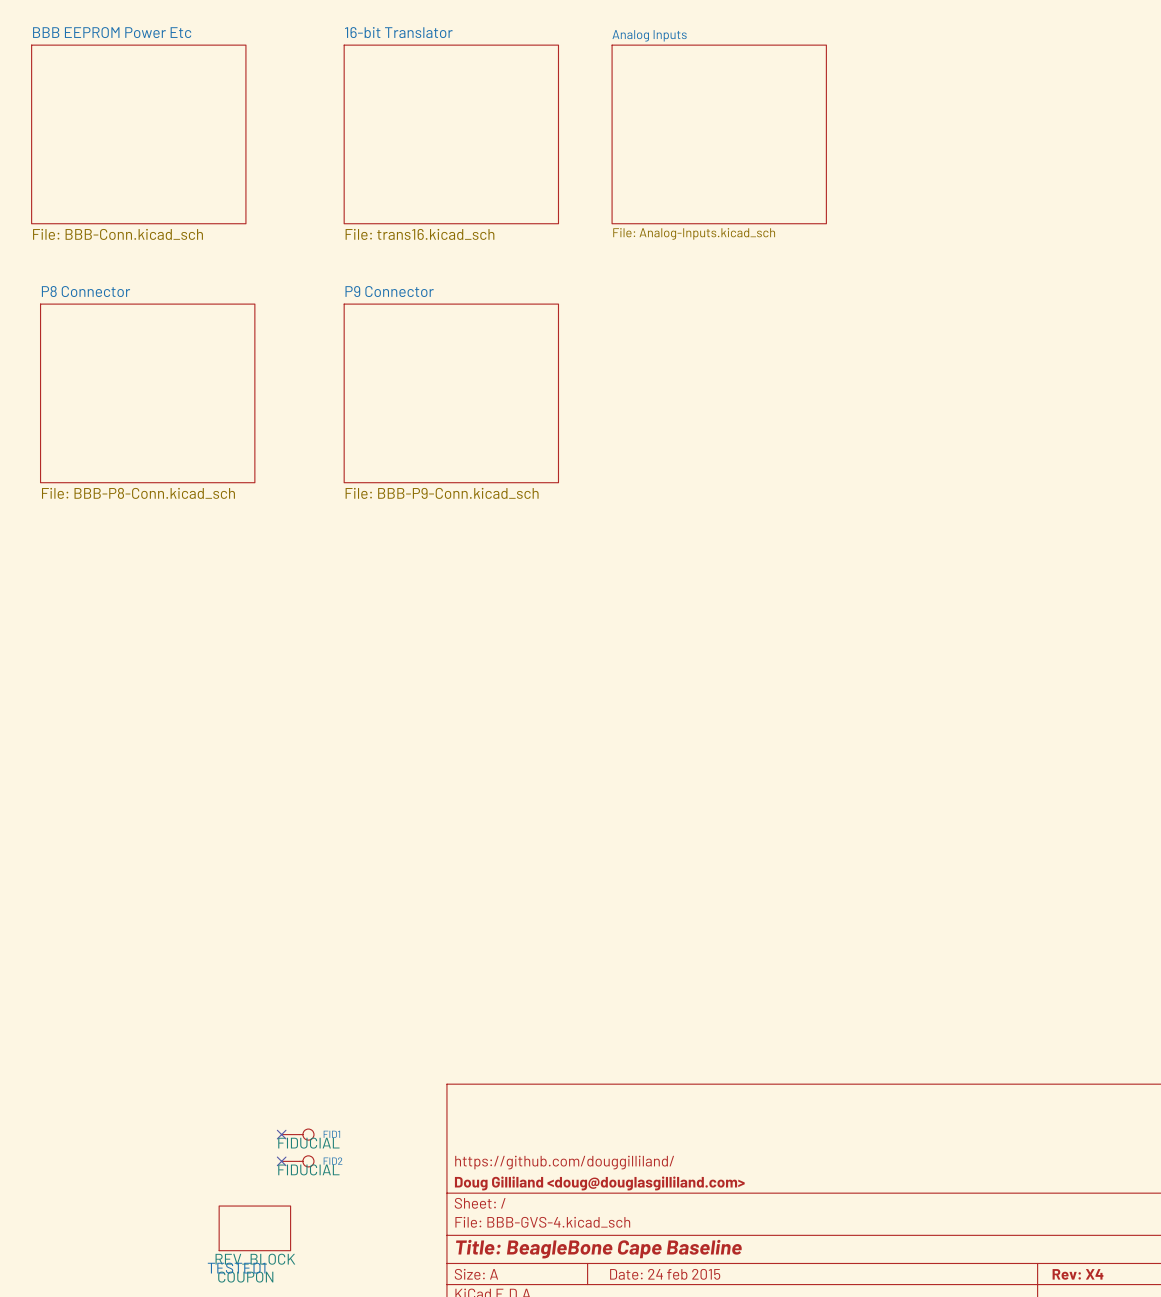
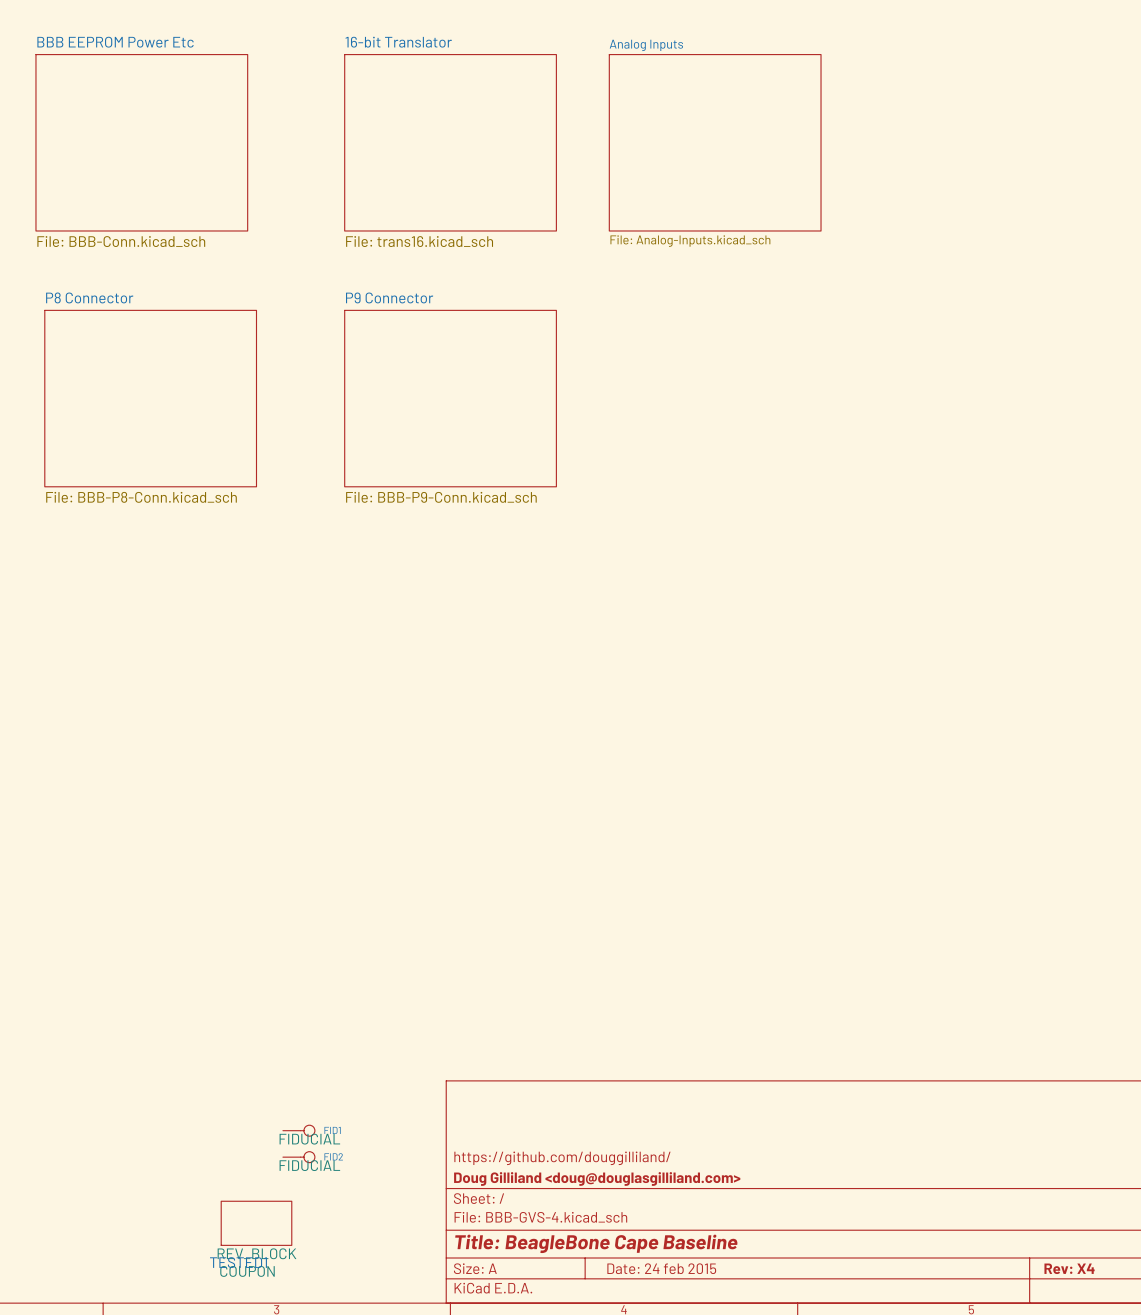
no-connect mark: (281, 1134) -> none
no-connect mark: (281, 1161) -> none

